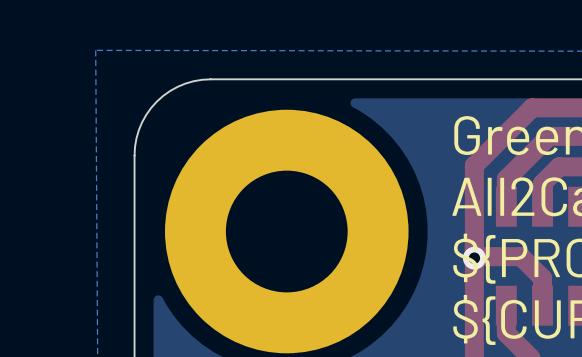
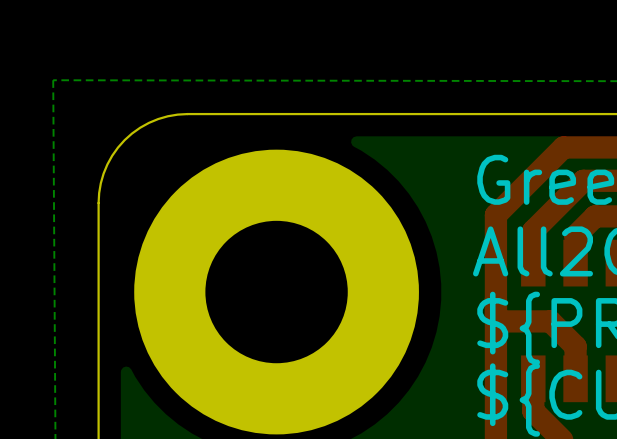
via: (474, 258) -> none

